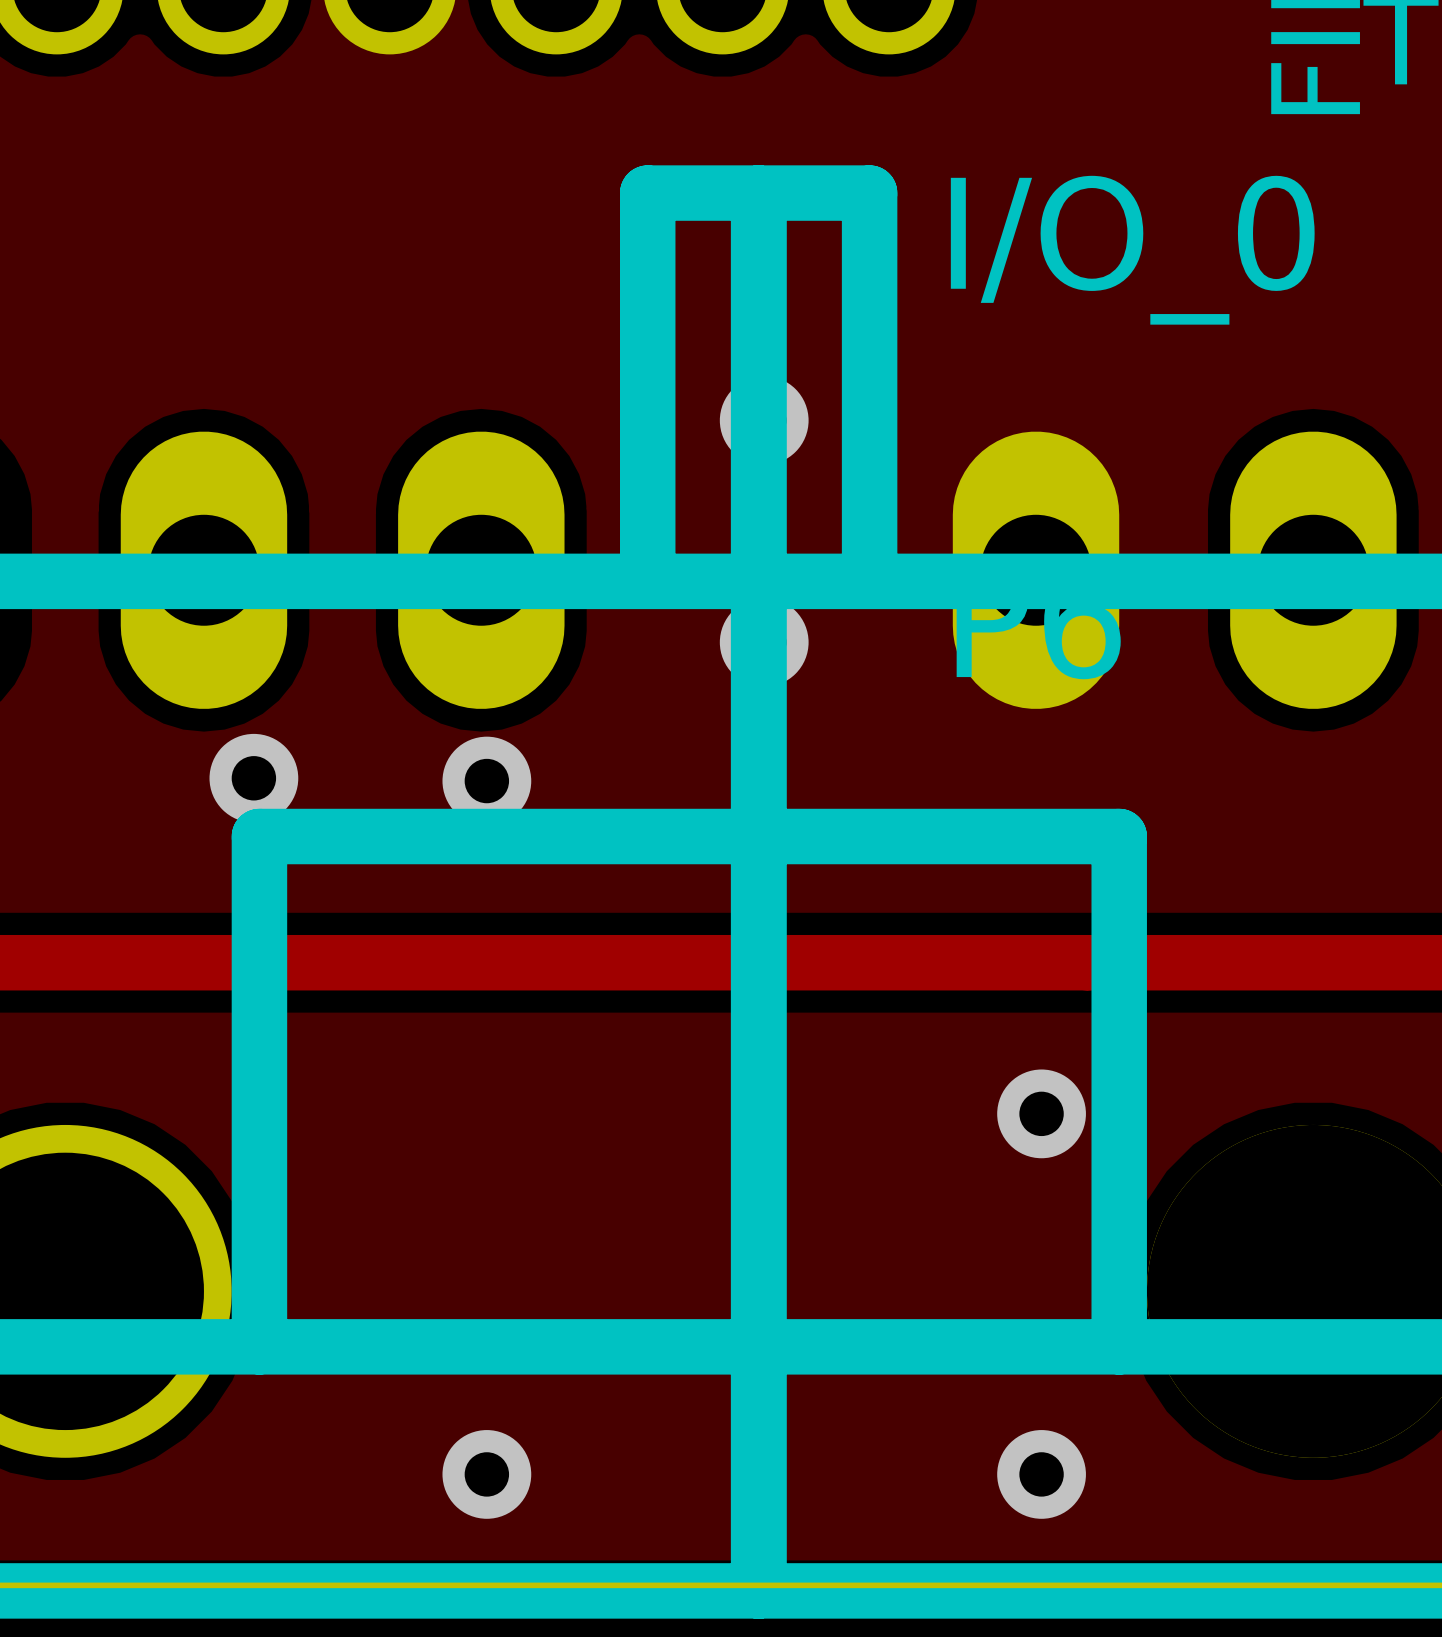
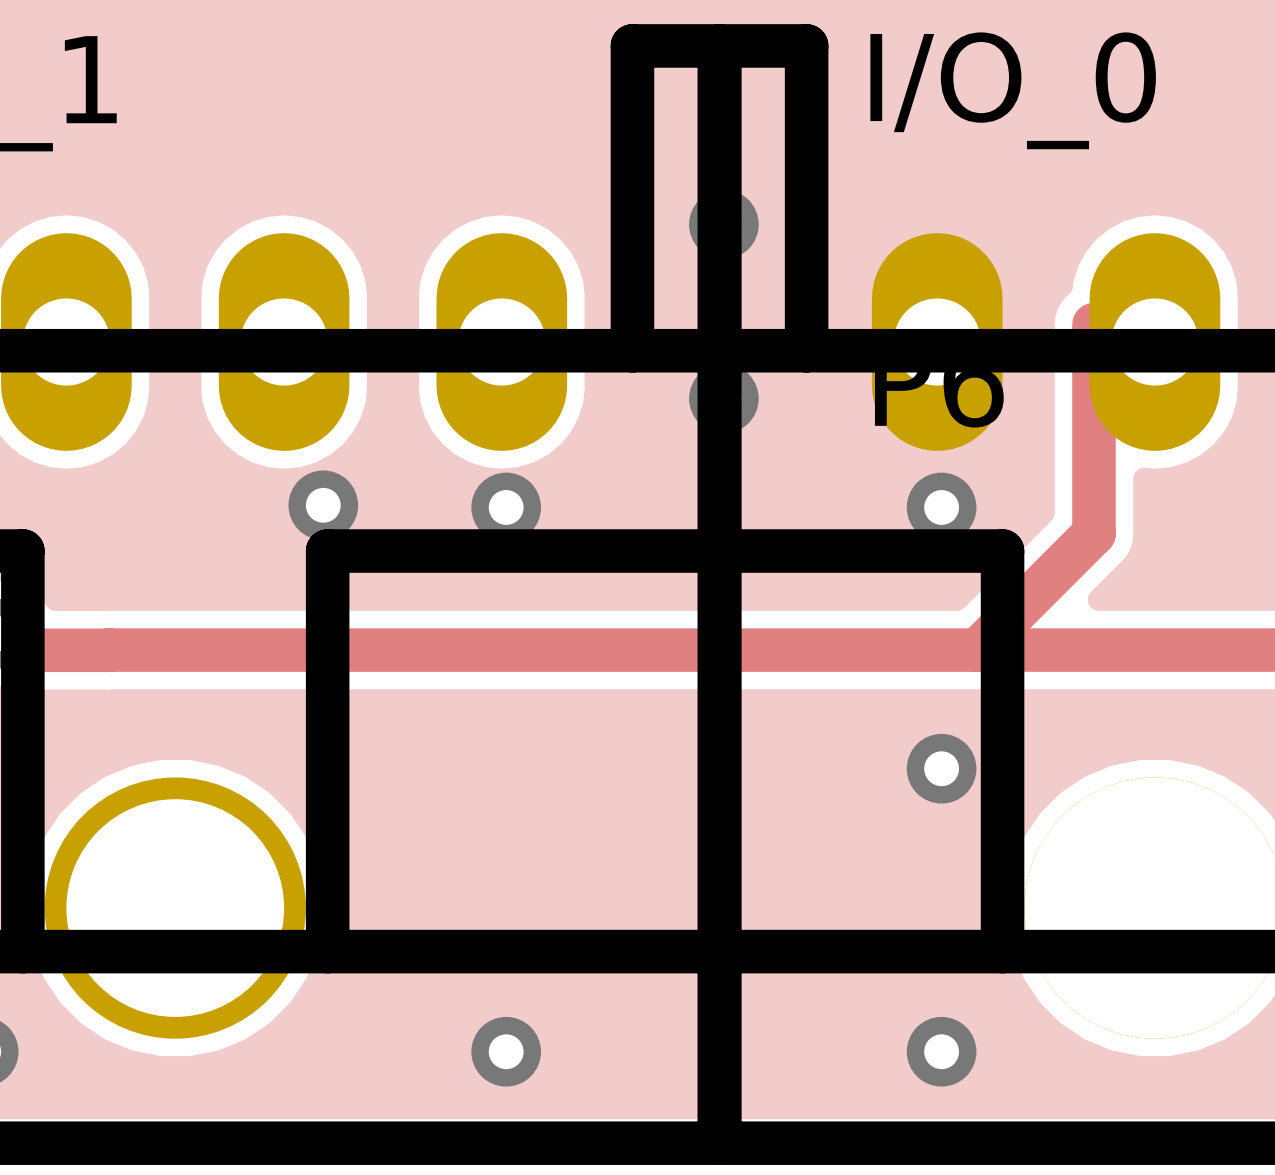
track: none -> (1093, 324) (1093, 533) (977, 650)
via: none -> (941, 507)

